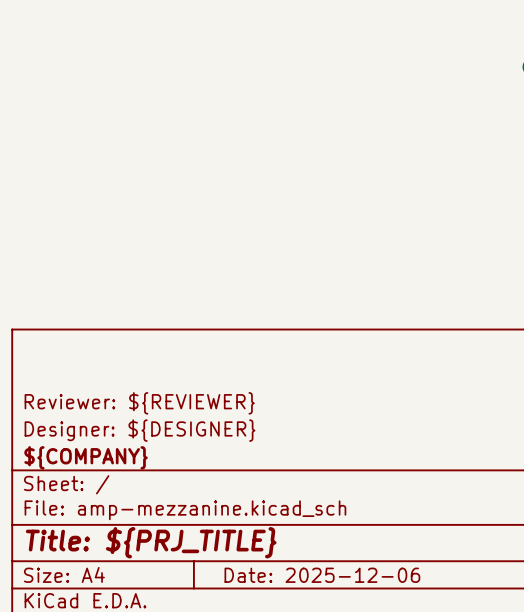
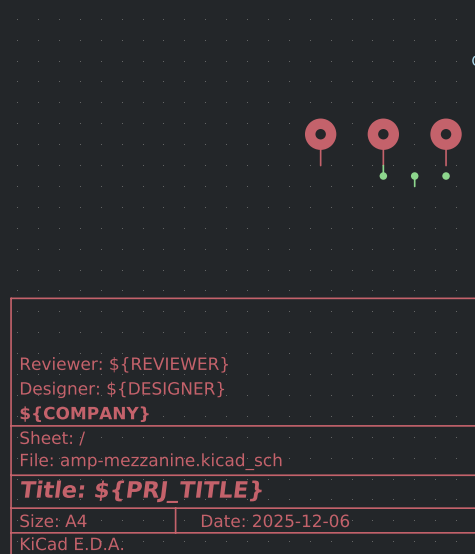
part: none -> (320, 142)
part: none -> (383, 142)
part: none -> (446, 142)
wire: none -> (383, 165) (383, 176)
junction: none -> (383, 176)
wire: none -> (414, 176) (414, 186)
junction: none -> (414, 176)
junction: none -> (446, 176)

